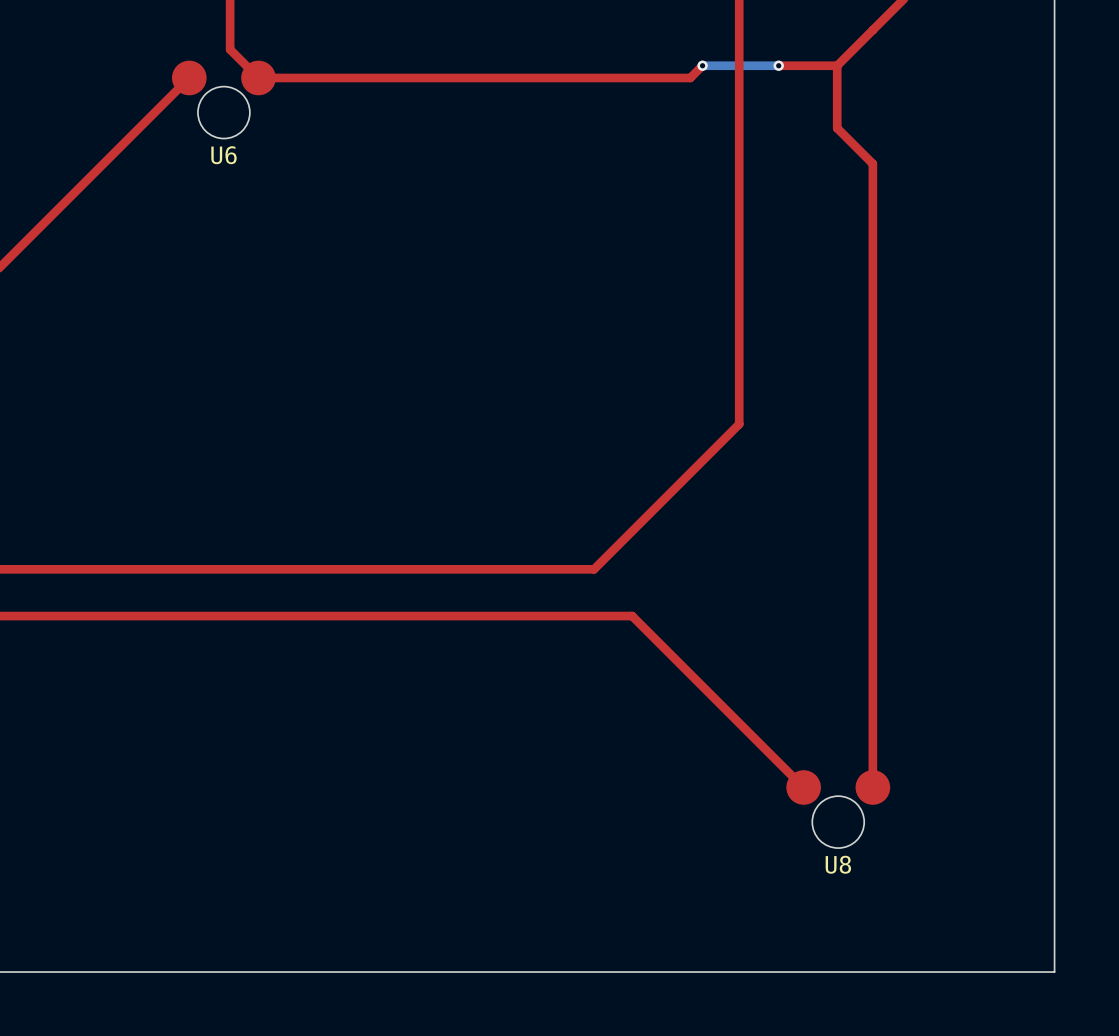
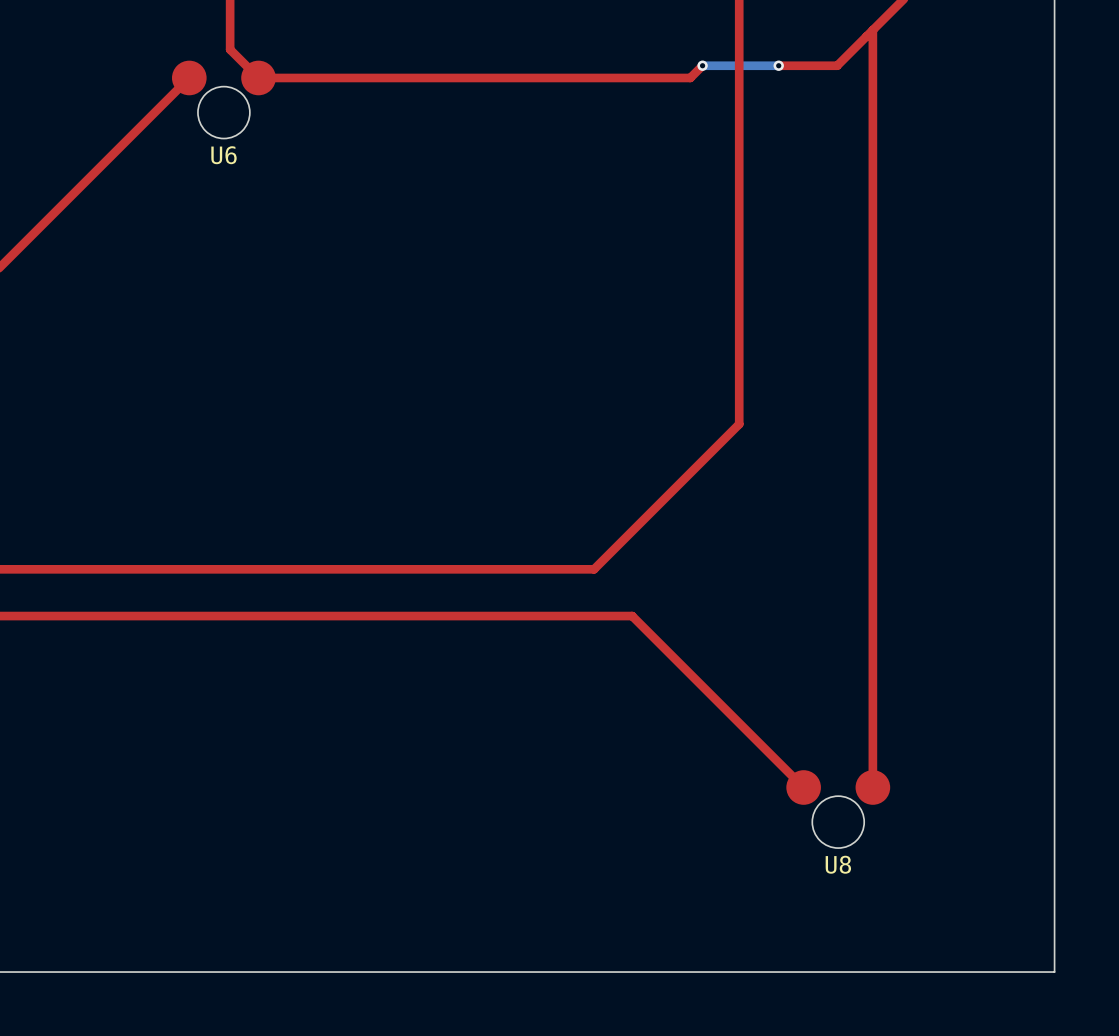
top track: (837, 65) (837, 128) (872, 163) -> (872, 30) (872, 163)

